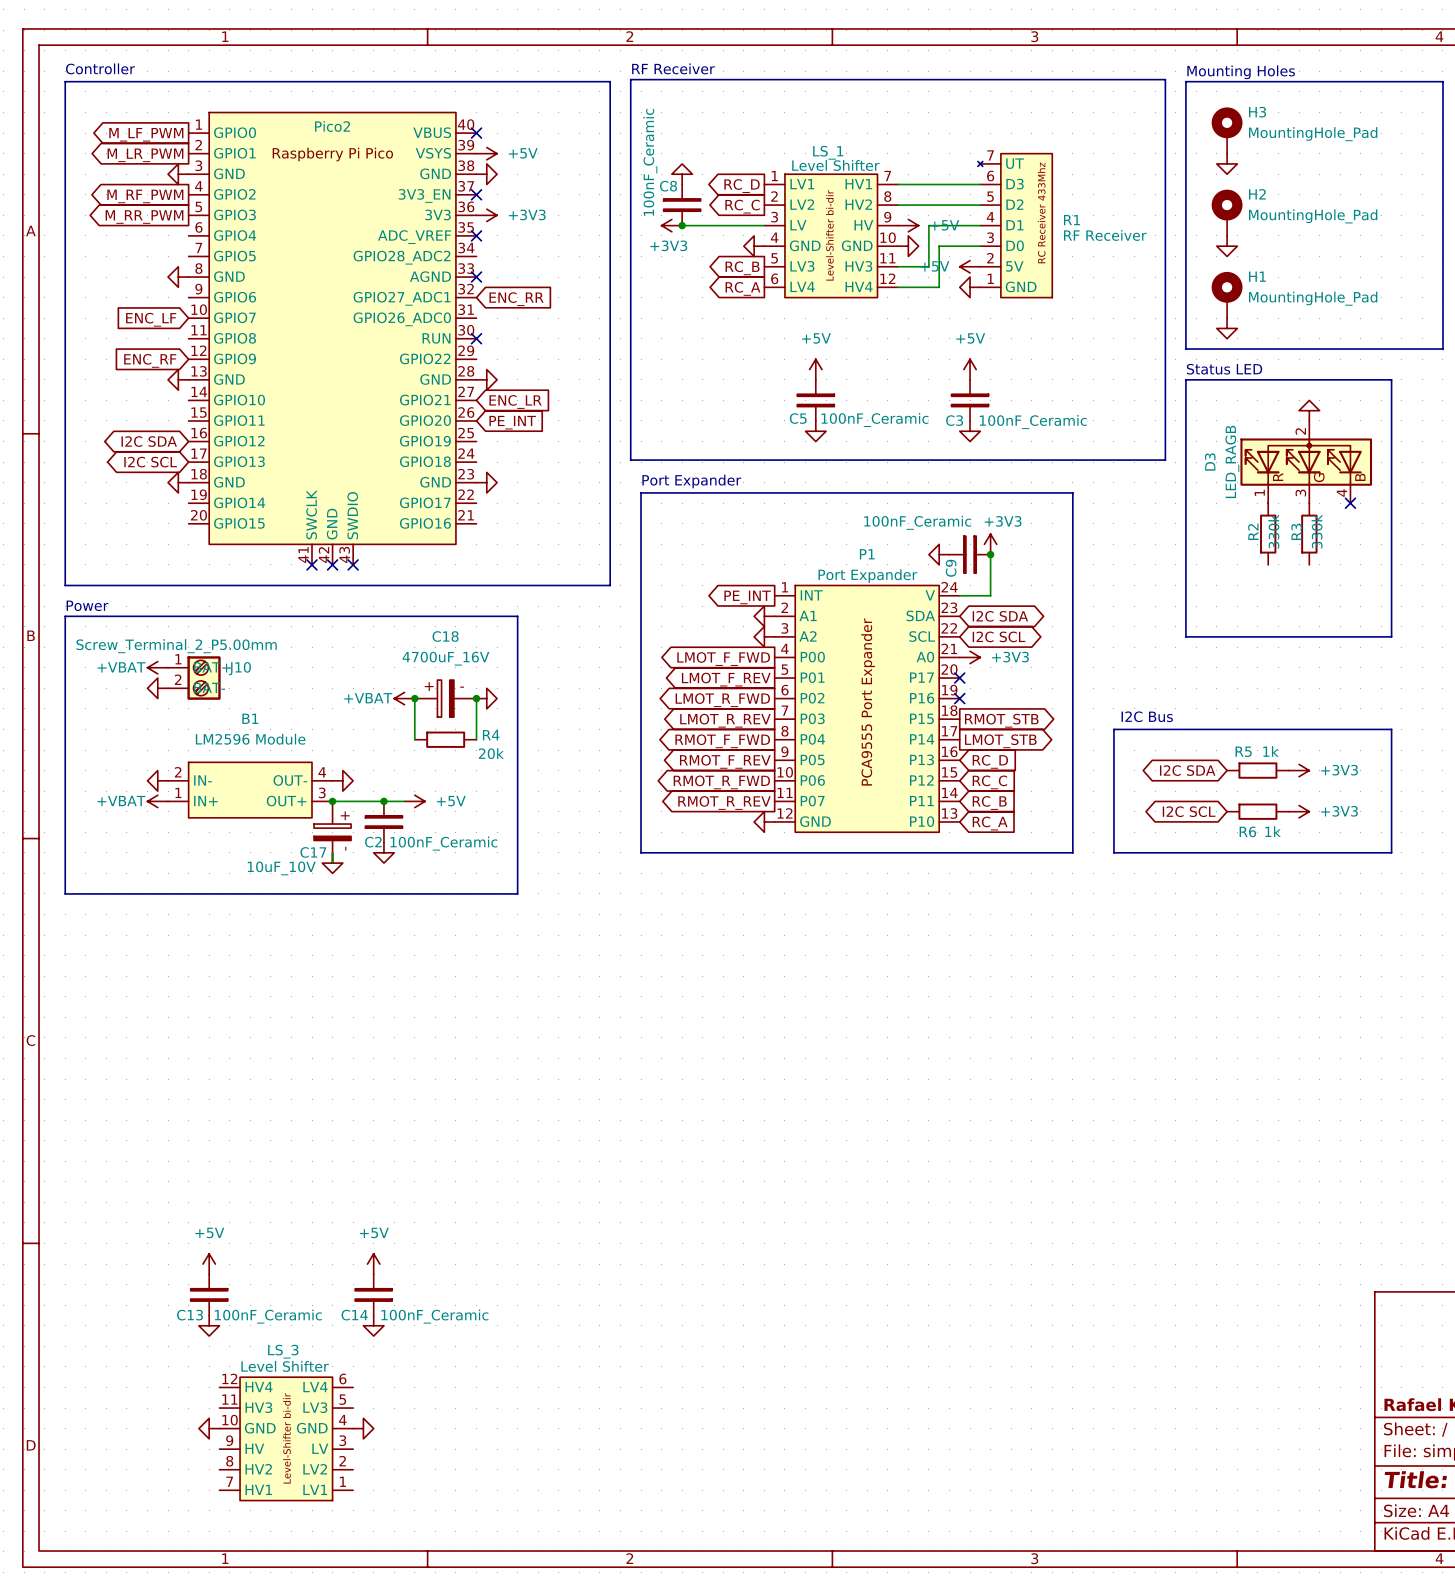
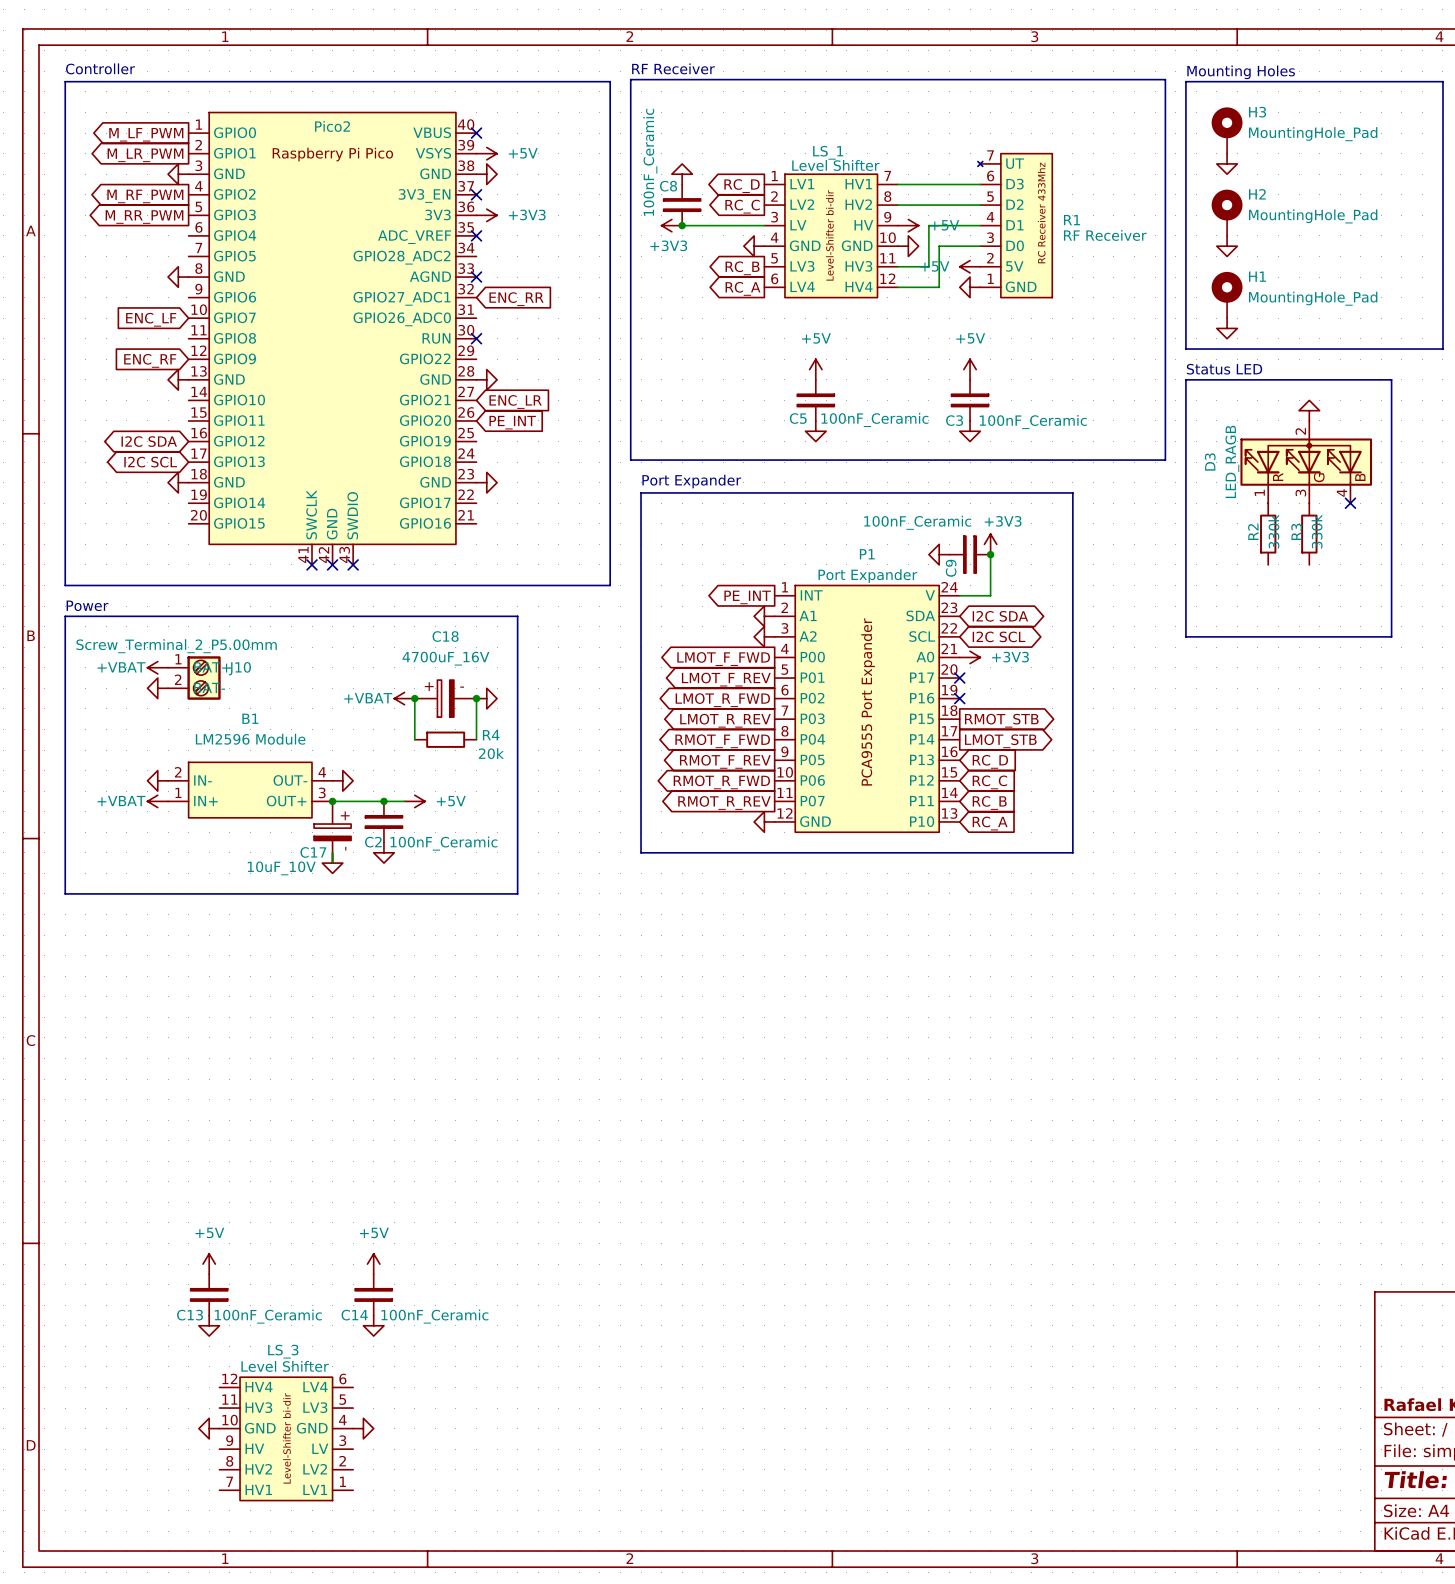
text: I2C Bus (1147, 716) -> none
line: (1113, 729) (1391, 729) (1391, 852) (1113, 852) (1113, 729) -> none
global label: I2C SDA (1187, 770) -> none
R5: 1k (1257, 770) -> none
power symbol: +3V3 (1299, 770) -> none
global label: I2C SCL (1189, 811) -> none
R6: 1k (1257, 811) -> none
power symbol: +3V3 (1299, 811) -> none

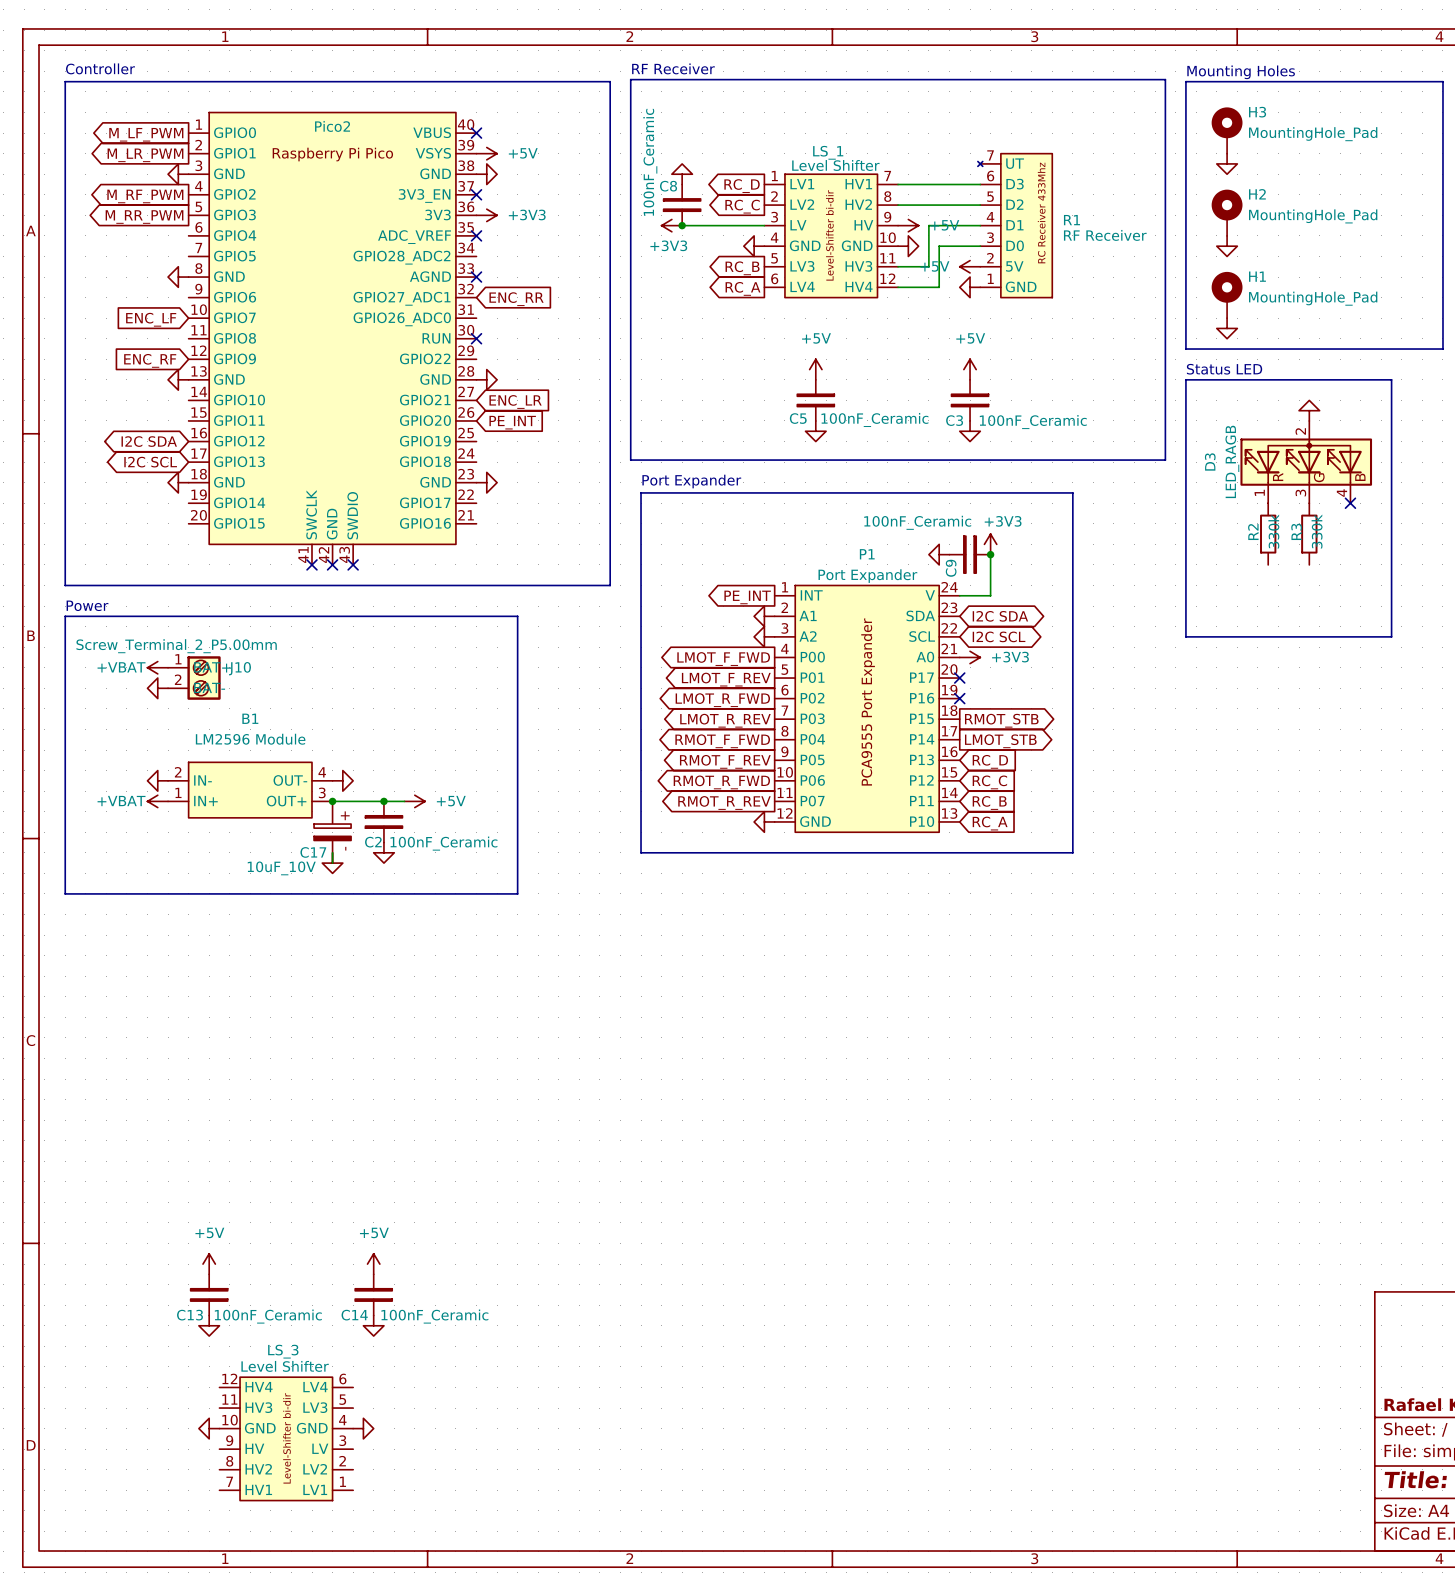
power symbol: +VBAT (404, 698) -> none
wire: (414, 698) (414, 739) -> none
junction: (414, 698) -> none
C18: 4700uF_16V (445, 698) -> none
wire: (476, 698) (476, 739) -> none
junction: (476, 698) -> none
power symbol: (486, 698) -> none
R4: 20k (445, 739) -> none

